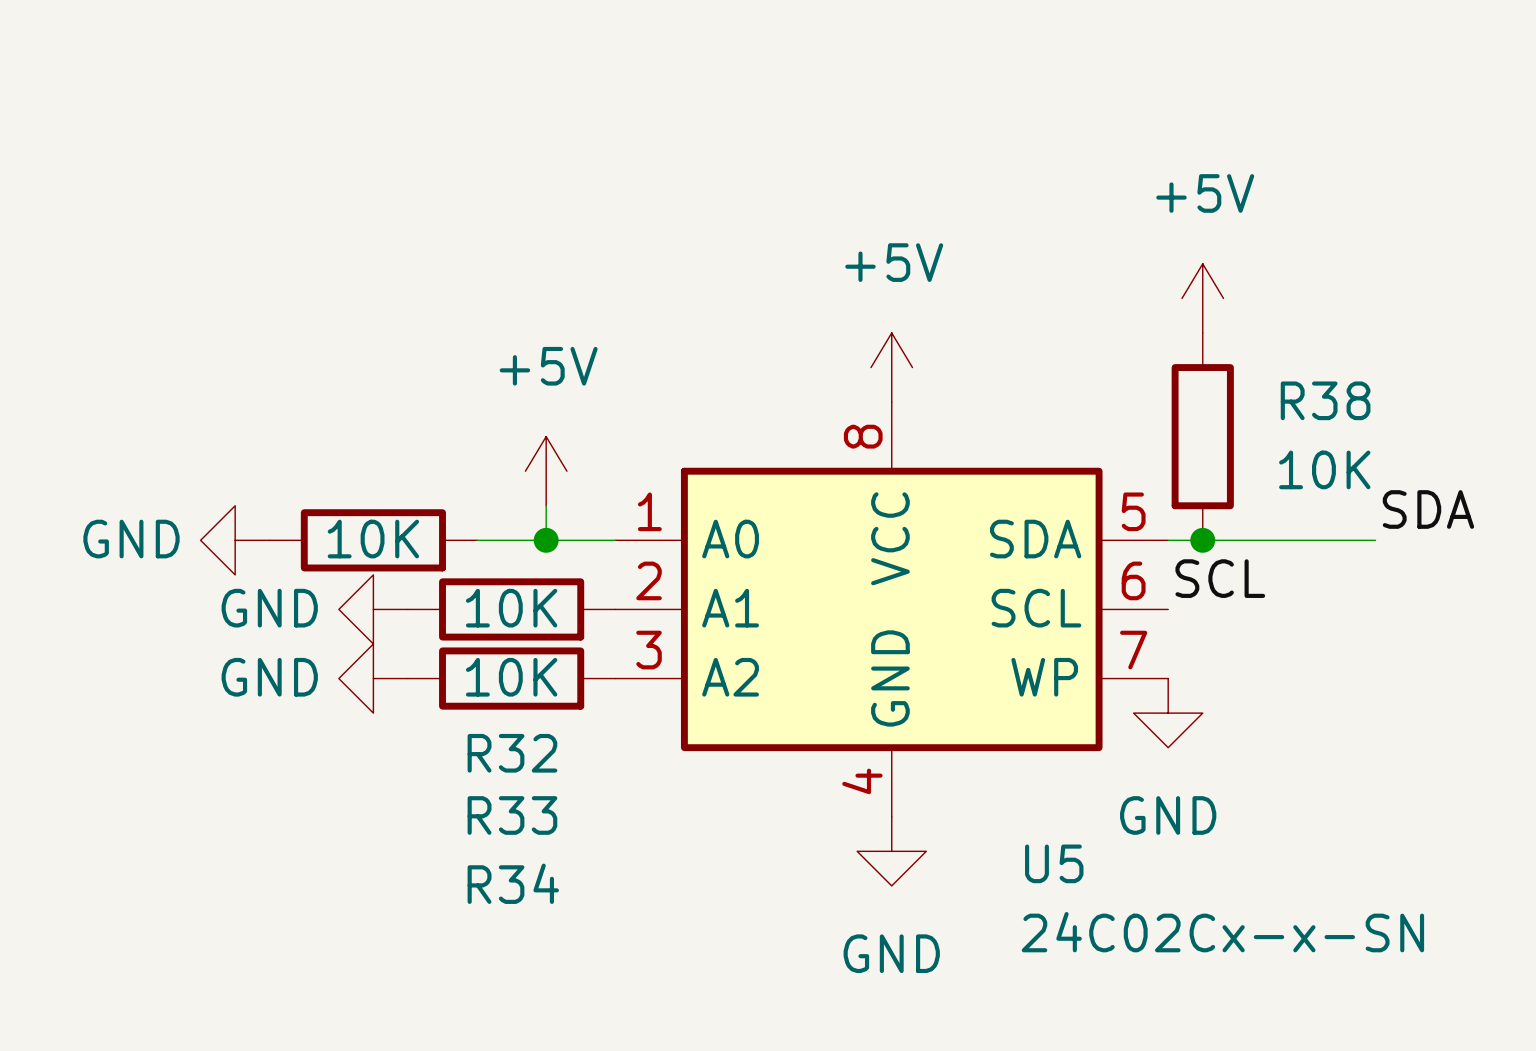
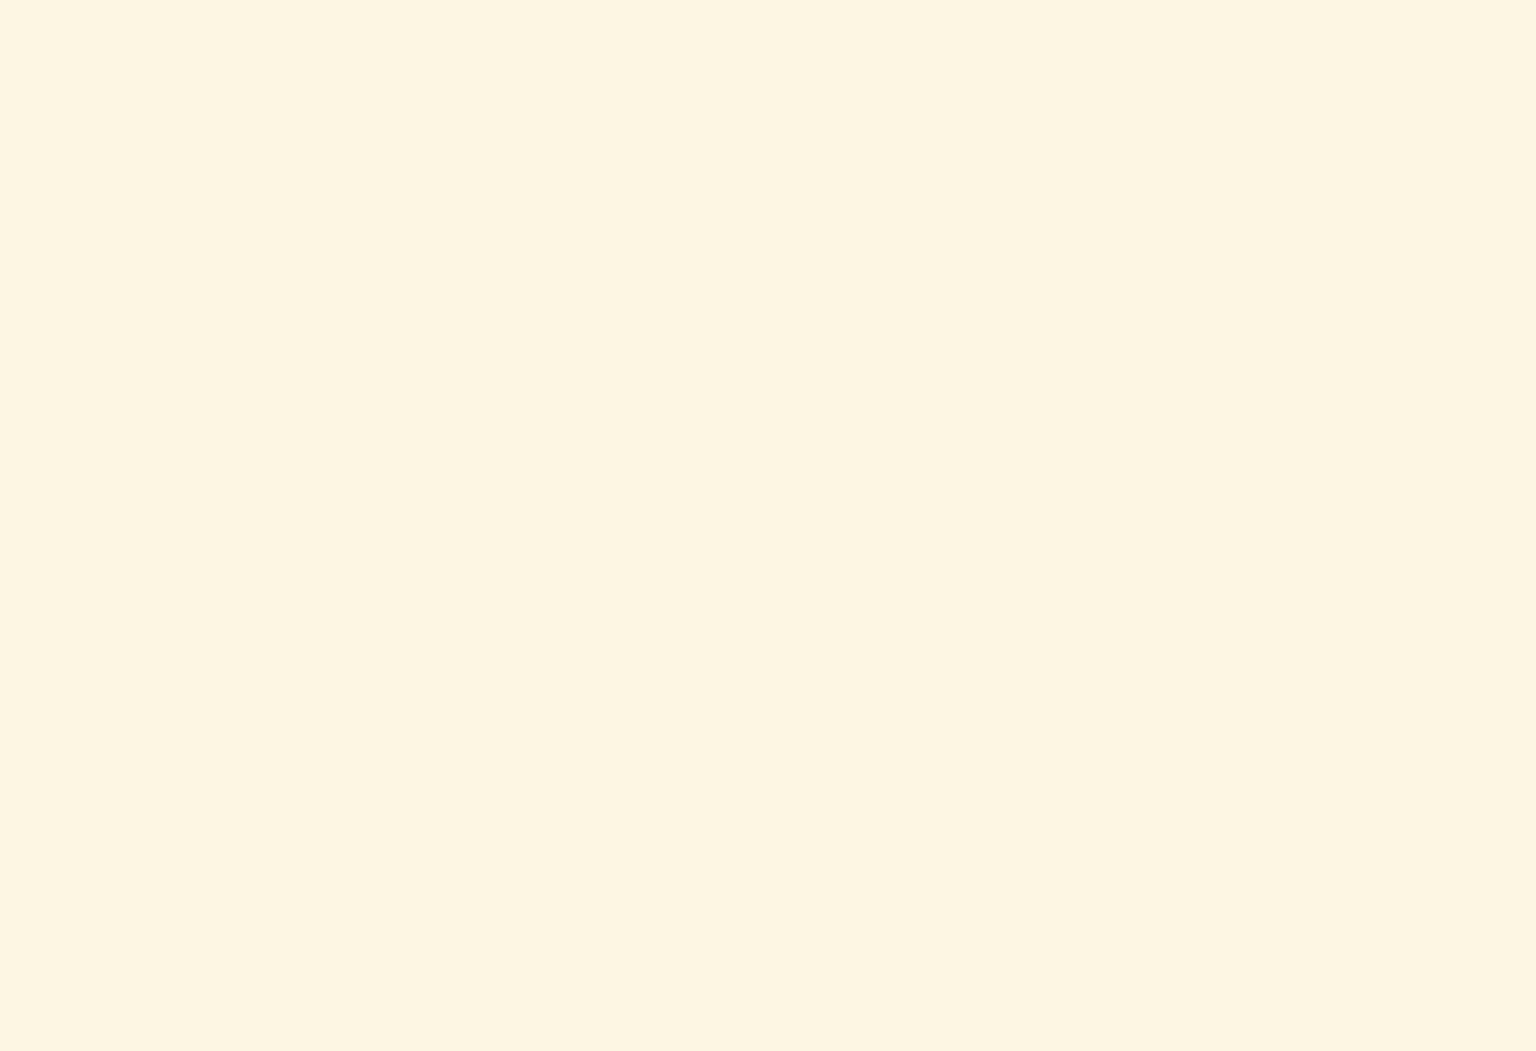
power symbol: +5V (1202, 298) -> none
power symbol: +5V (891, 367) -> none
R38: 10K (1202, 436) -> none
power symbol: +5V (546, 471) -> none
wire: (546, 505) (546, 540) -> none
label: SDA (1428, 509) -> none
power symbol: GND (235, 540) -> none
R32: 10K (373, 540) -> none
wire: (477, 540) (615, 540) -> none
junction: (546, 540) -> none
wire: (1168, 540) (1375, 540) -> none
junction: (1202, 540) -> none
label: SCL (1220, 578) -> none
power symbol: GND (373, 609) -> none
R33: 10K (511, 609) -> none
U5: 24C02Cx-x-SN (891, 609) -> none
power symbol: GND (373, 678) -> none
R34: 10K (511, 678) -> none
power symbol: GND (1168, 713) -> none
power symbol: GND (891, 851) -> none

